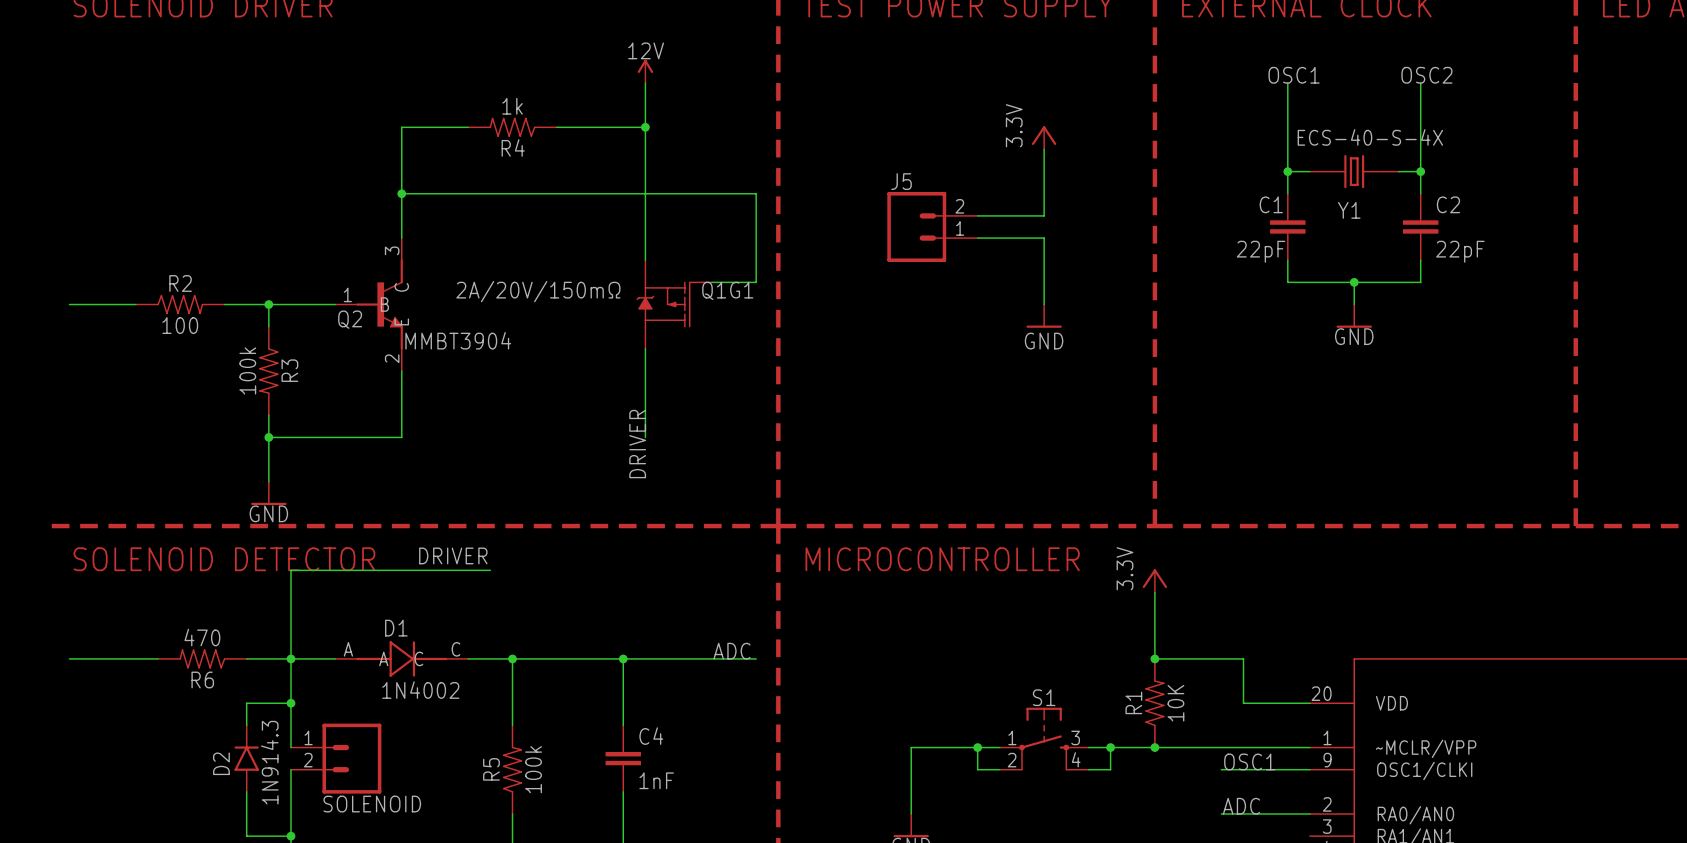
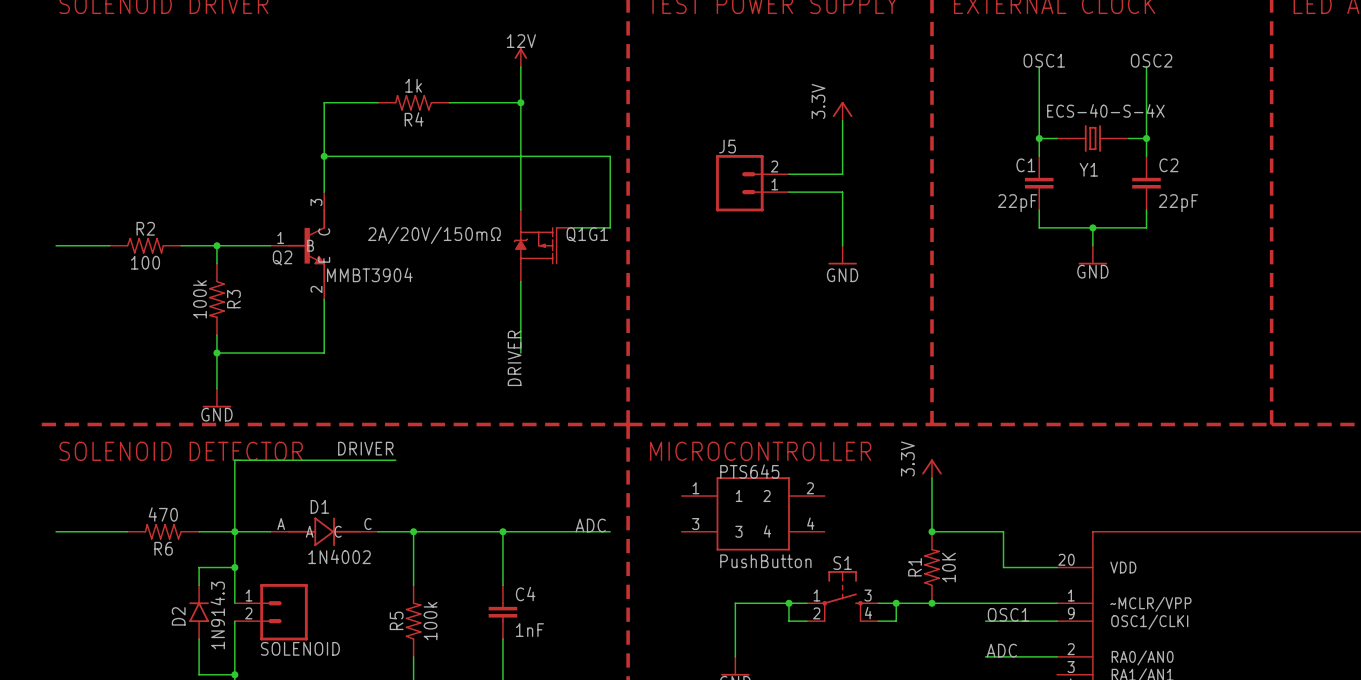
part: none -> (753, 513)

